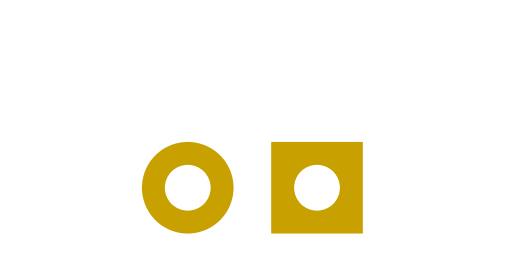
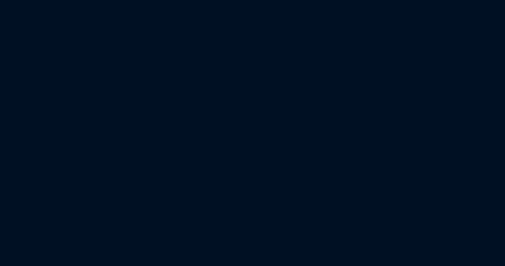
part: (252, 187) -> none

